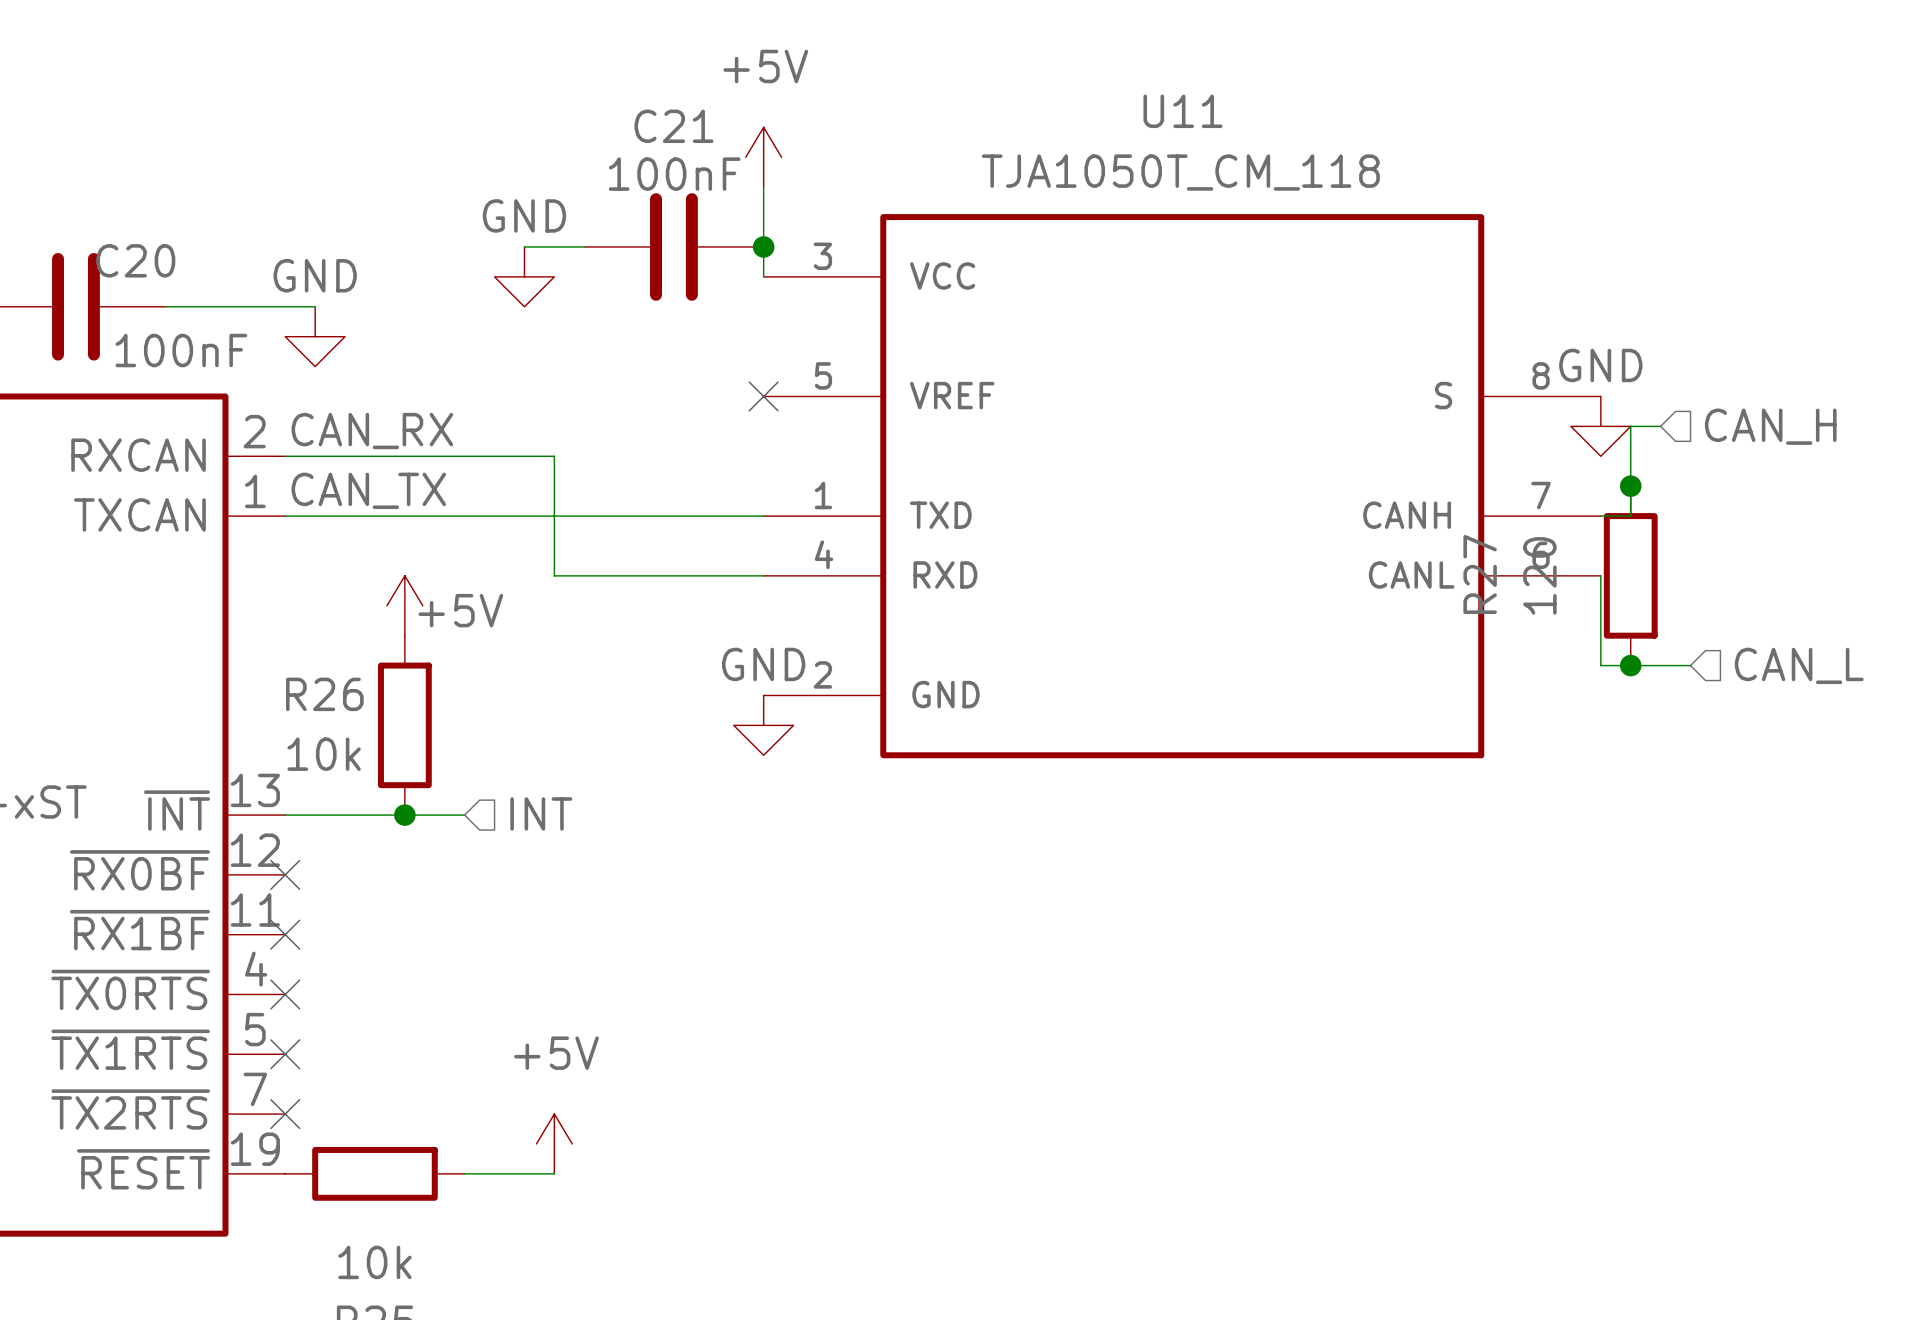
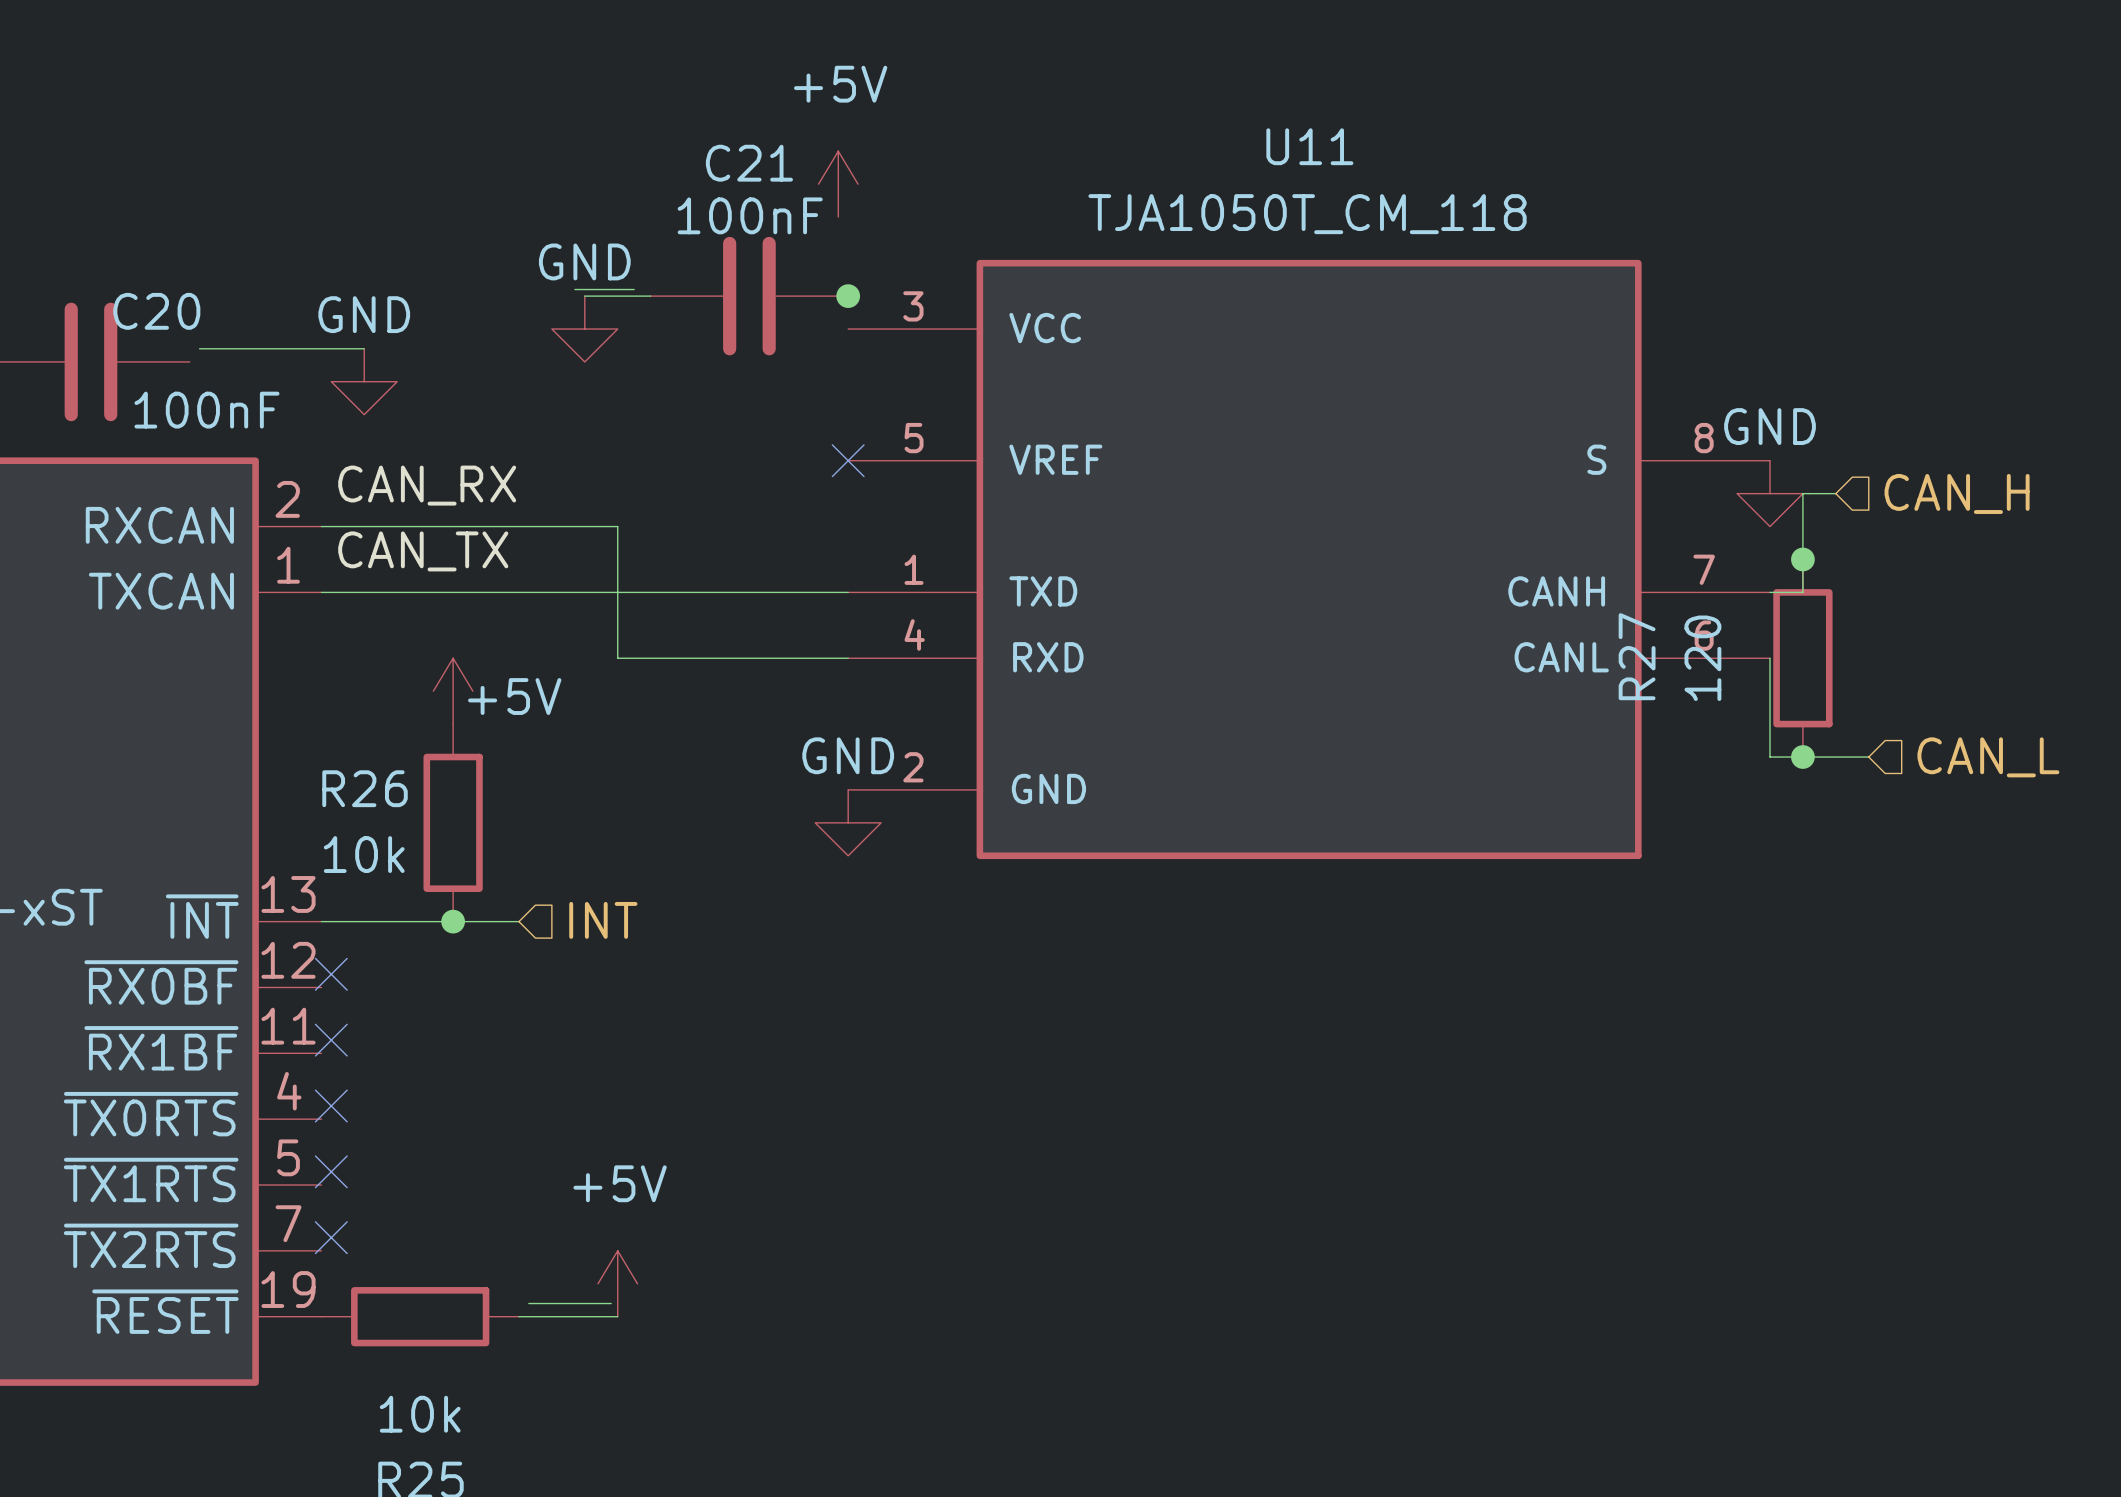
power symbol position: +5V (763, 157) -> +5V (838, 184)
wire: (763, 187) (763, 276) -> none
wire: none -> (574, 289) (634, 289)
wire: (165, 306) (315, 306) -> (199, 348) (364, 348)
power symbol position: GND (315, 336) -> GND (364, 381)
label position: CAN_RX (372, 431) -> CAN_RX (427, 485)
label position: CAN_TX (368, 490) -> CAN_TX (423, 551)
no-connect mark position: (285, 874) -> (331, 974)
no-connect mark position: (285, 934) -> (331, 1040)
no-connect mark position: (285, 994) -> (331, 1105)
no-connect mark position: (285, 1054) -> (331, 1171)
no-connect mark position: (285, 1114) -> (331, 1237)
wire: none -> (528, 1303) (611, 1303)

